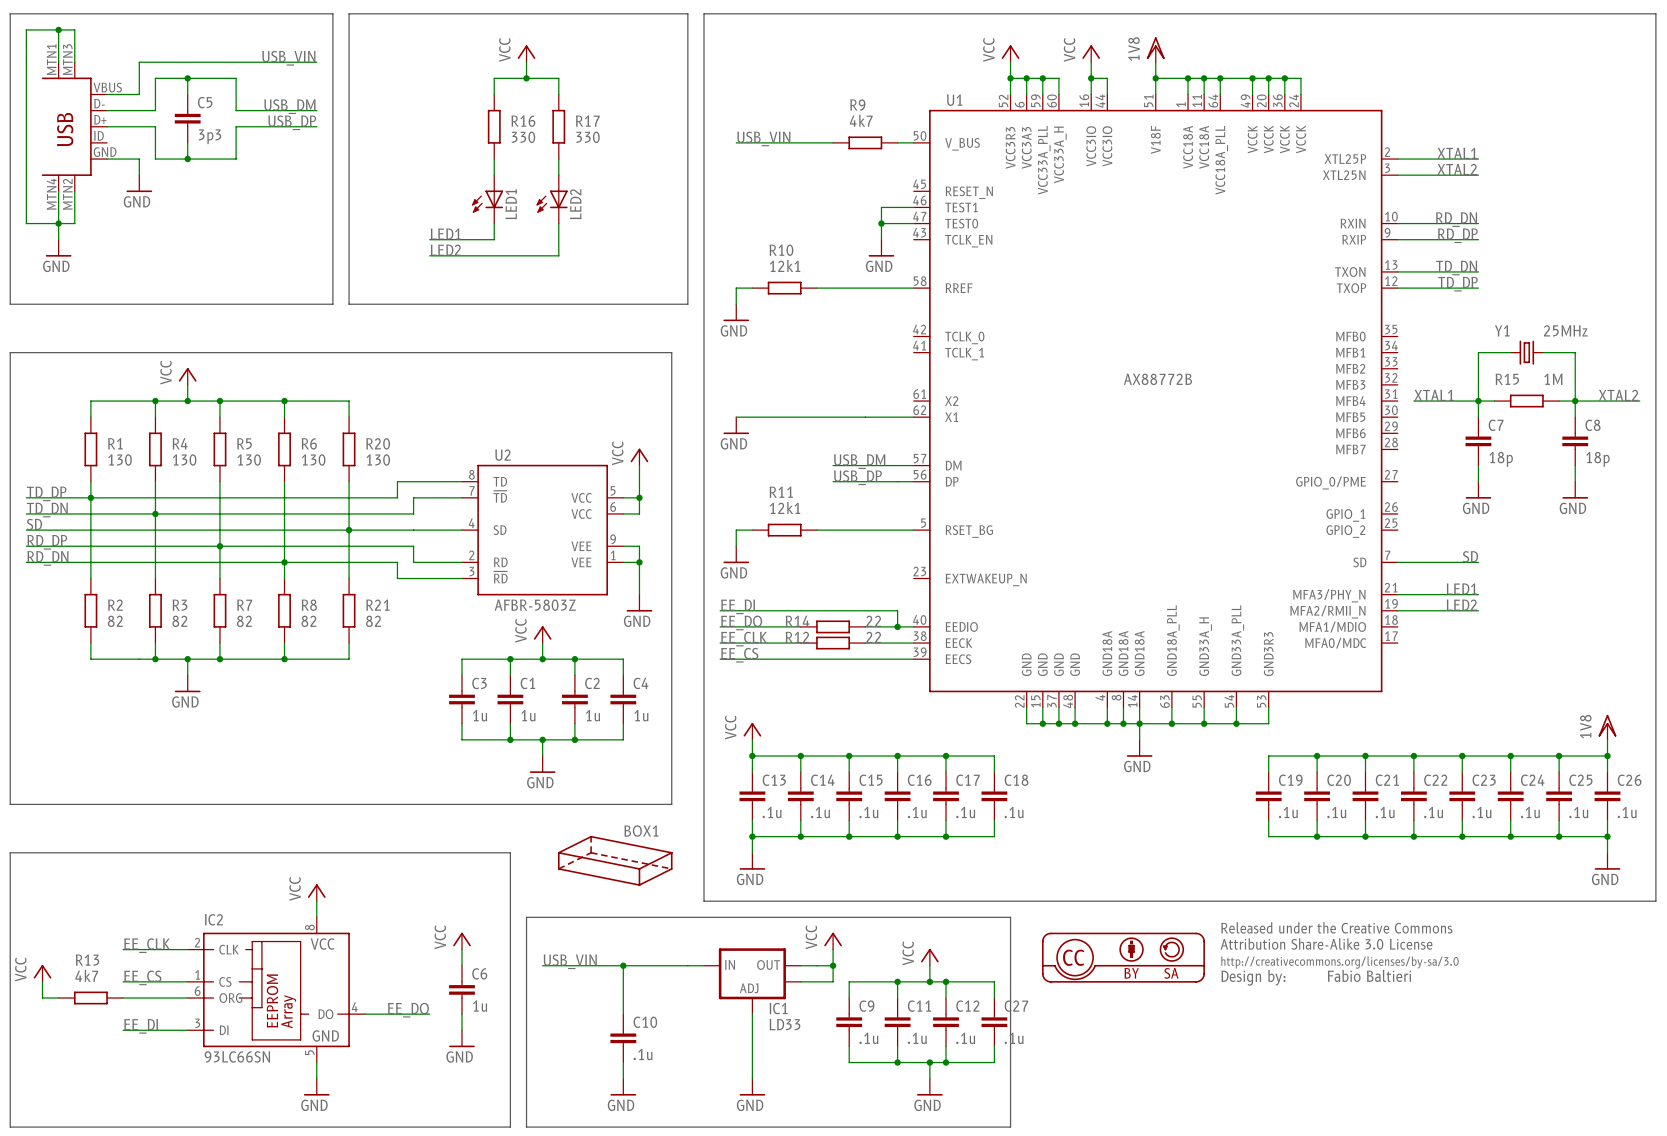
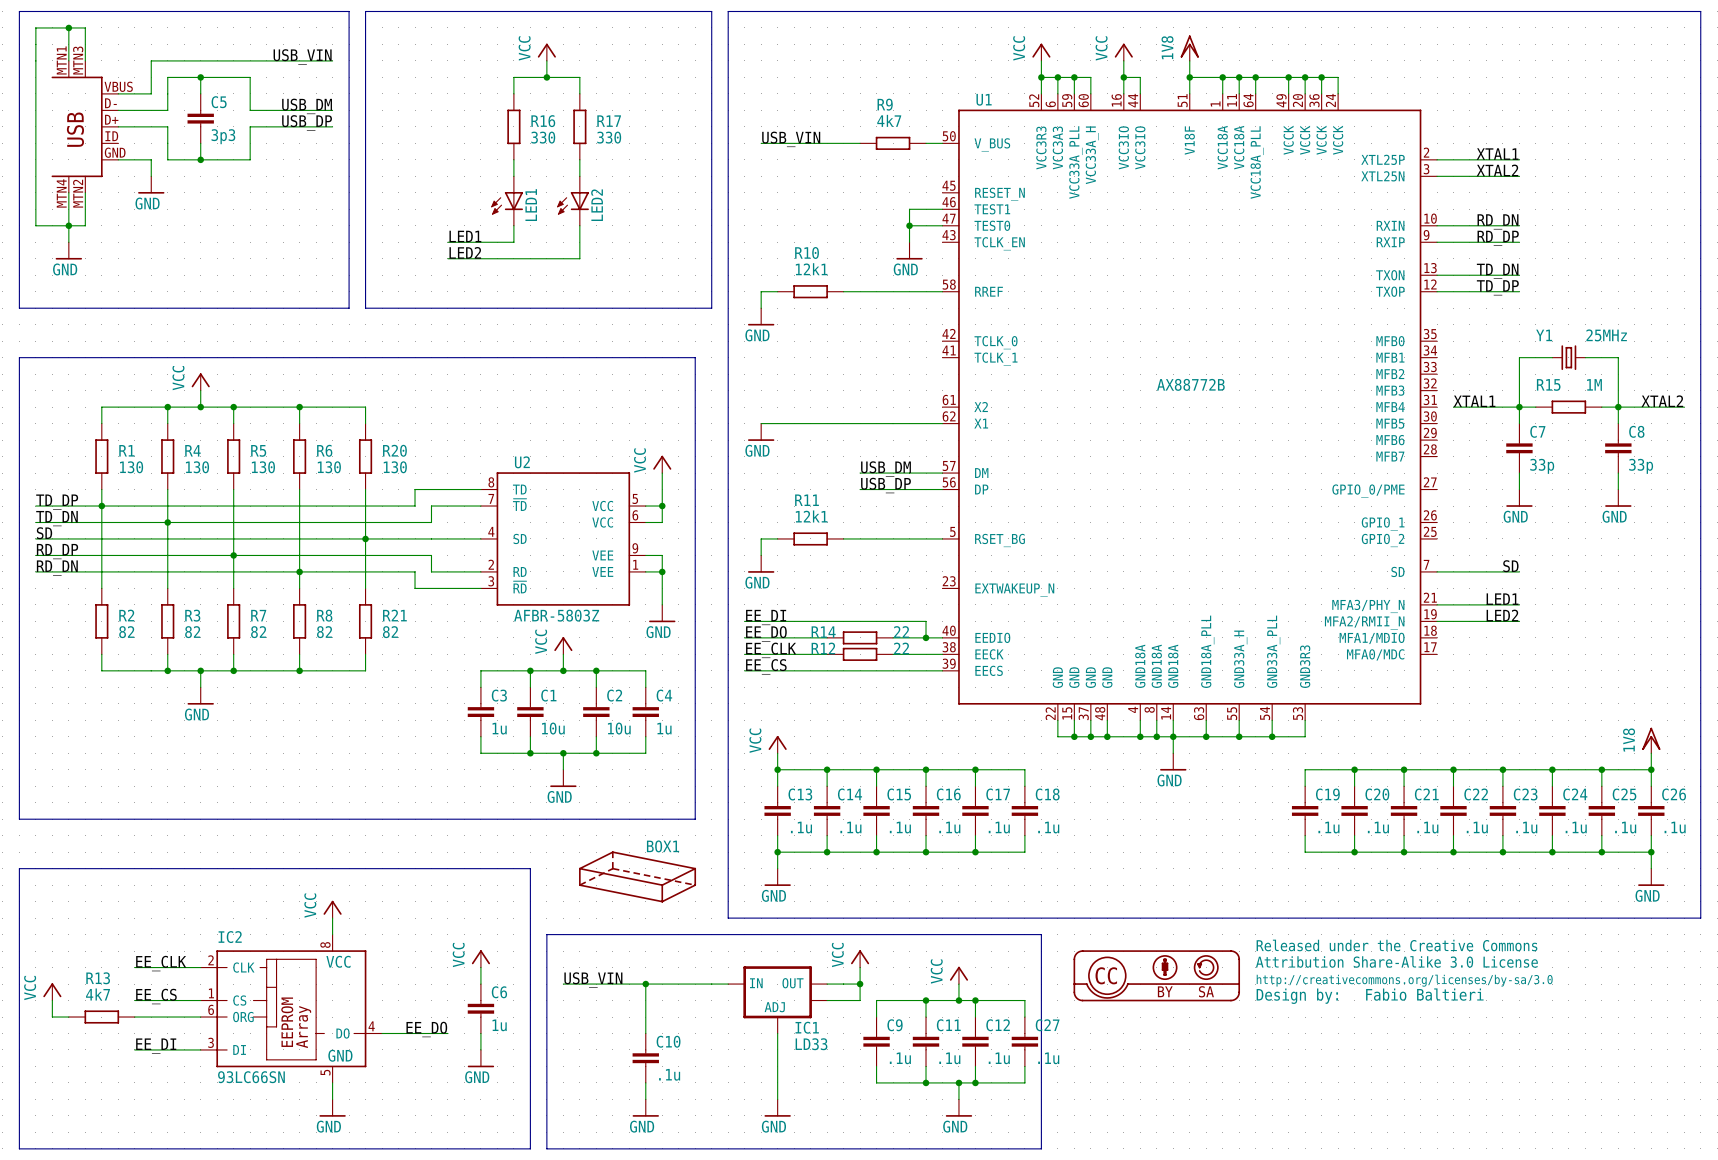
C7 value: 18p (1501, 459) -> 33p (1542, 466)
C8 value: 18p (1597, 459) -> 33p (1641, 466)
C1 value: 1u (528, 715) -> 10u (553, 728)
C2 value: 1u (592, 715) -> 10u (619, 728)

